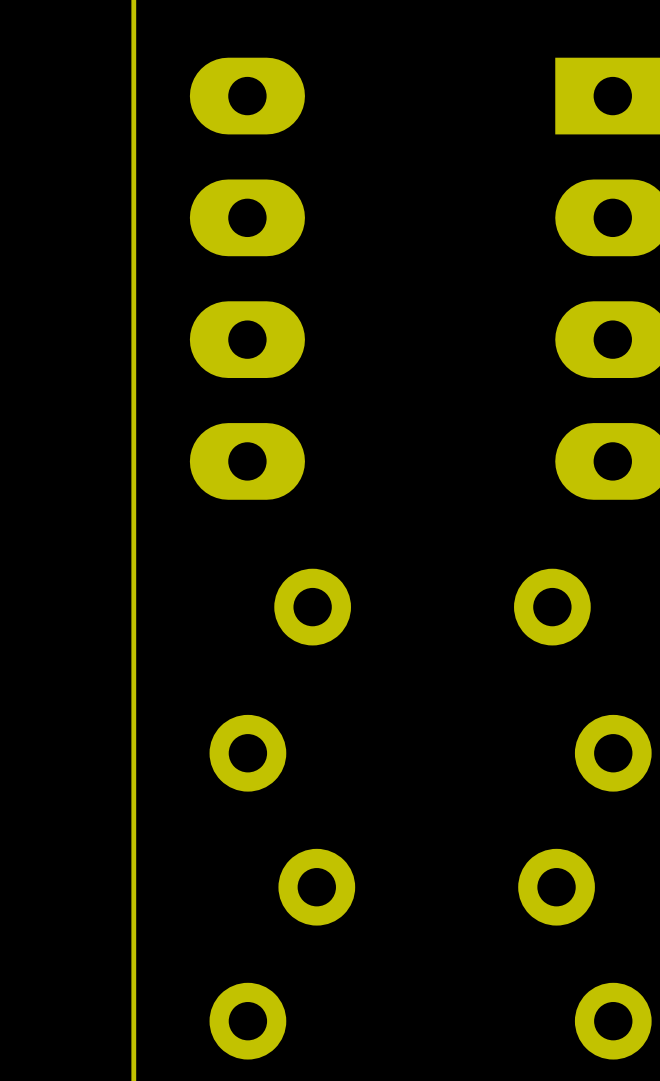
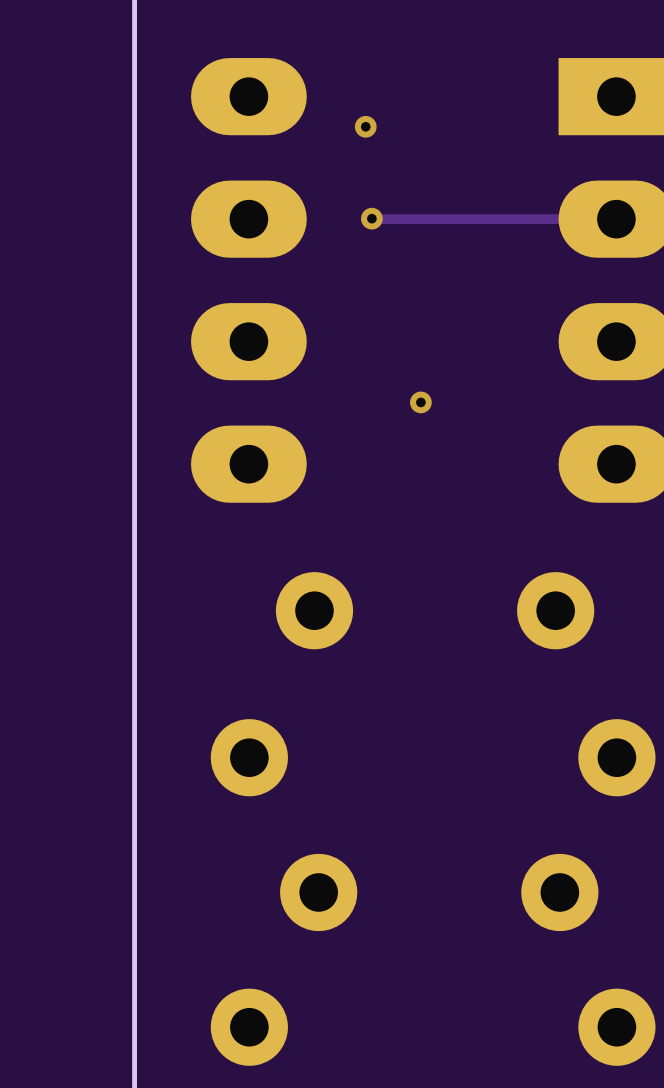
via: none -> (365, 126)
via: none -> (371, 218)
track: none -> (616, 219) (372, 219)
via: none -> (420, 402)

